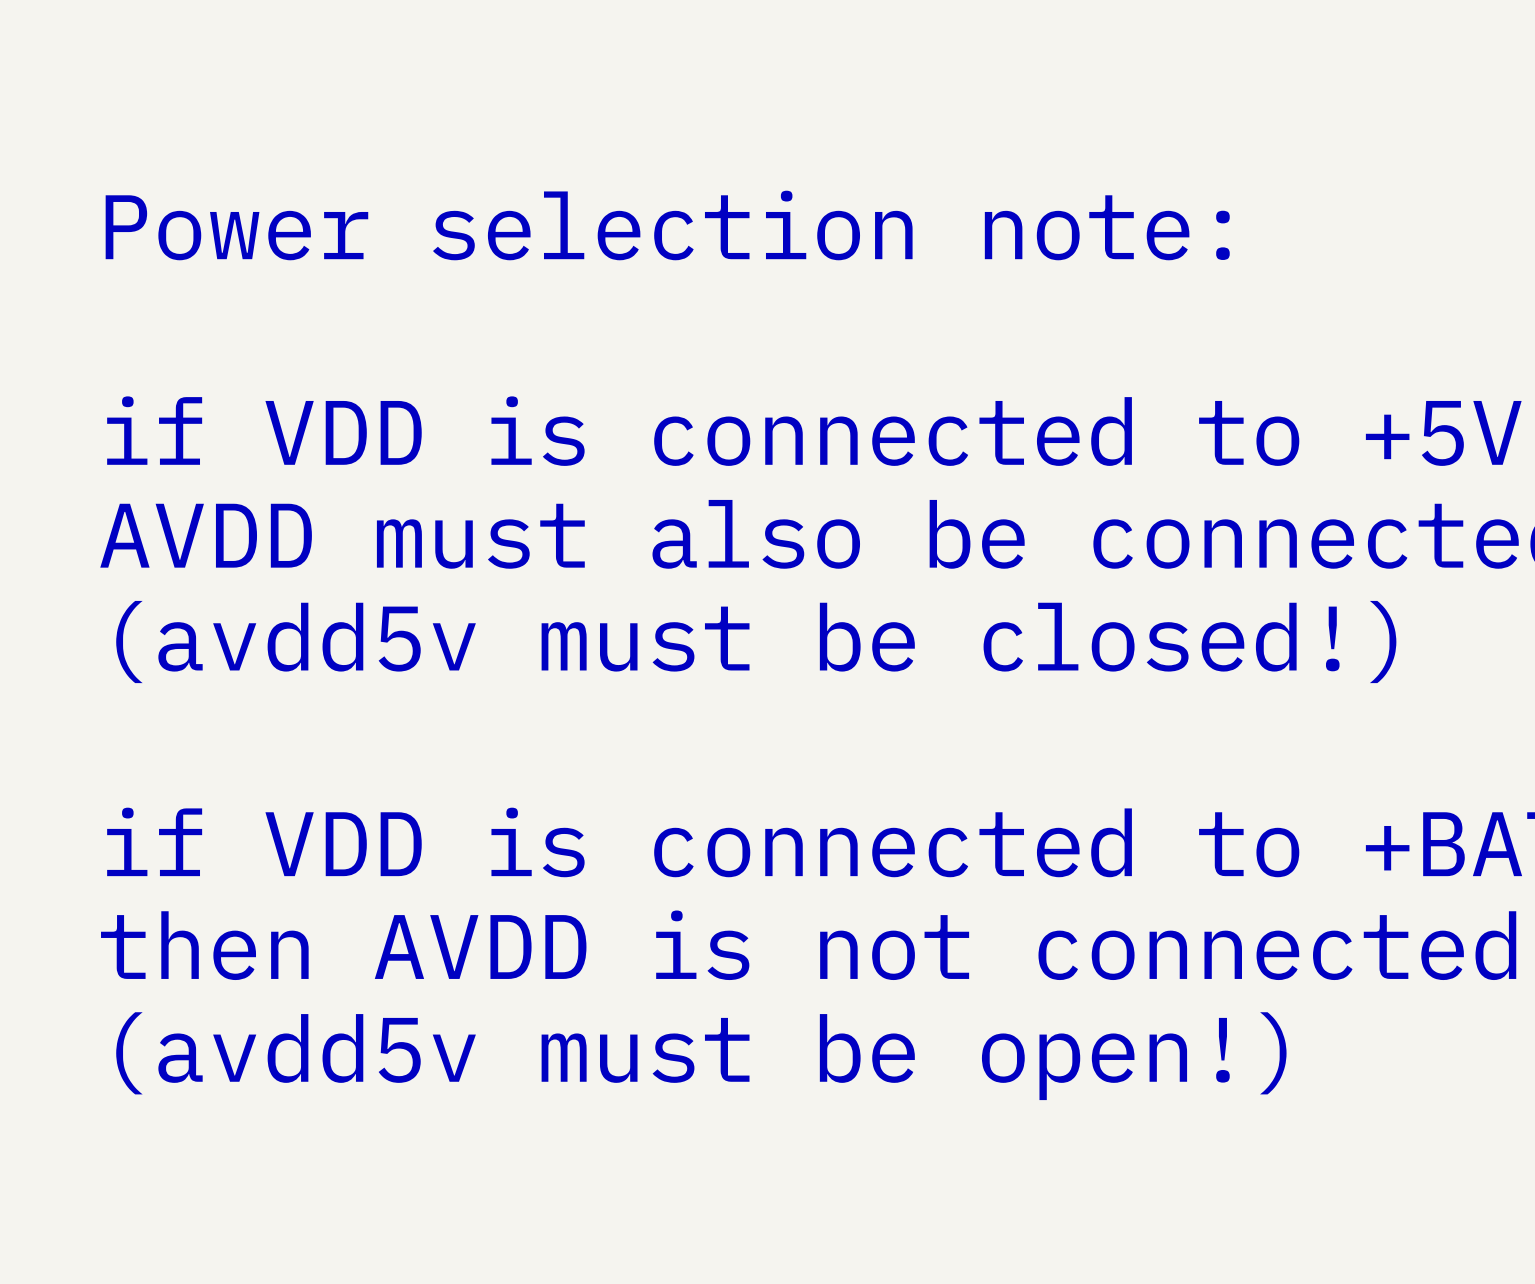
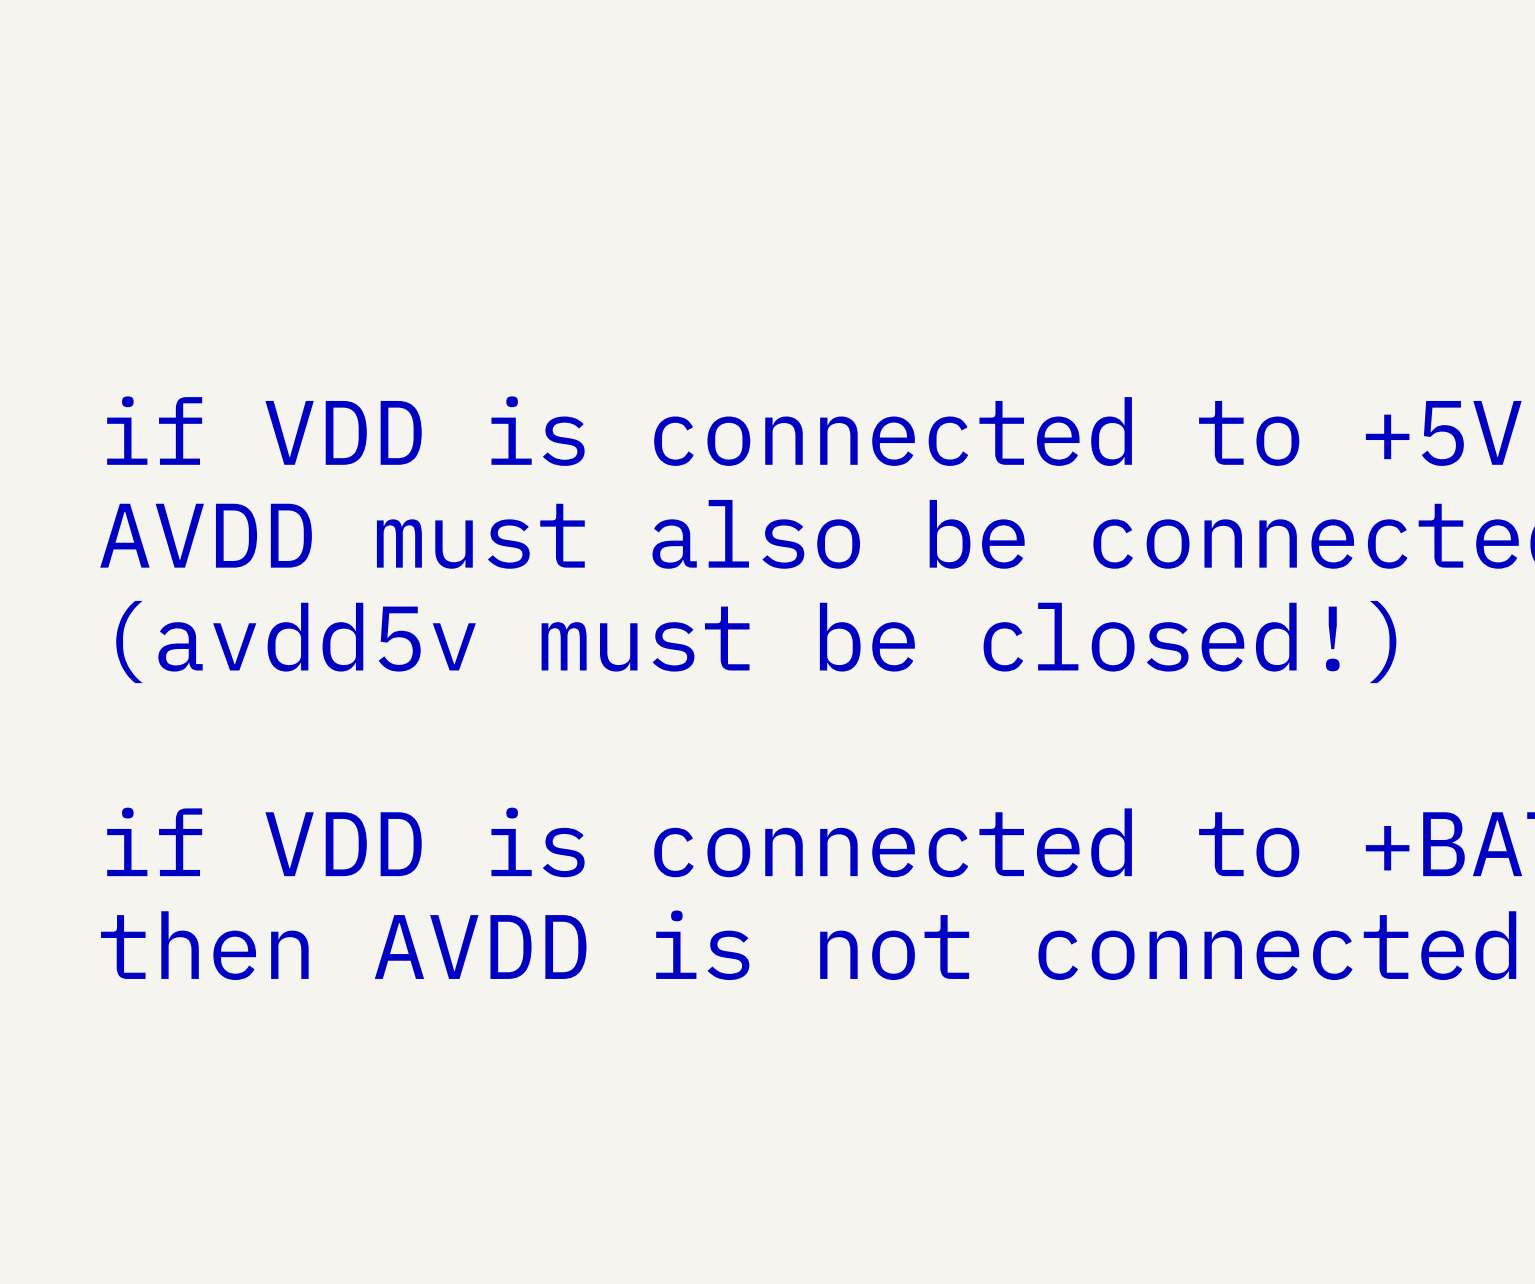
text: Power selection note: (667, 225) -> none
text: (avdd5v must be open!) (701, 1056) -> none

